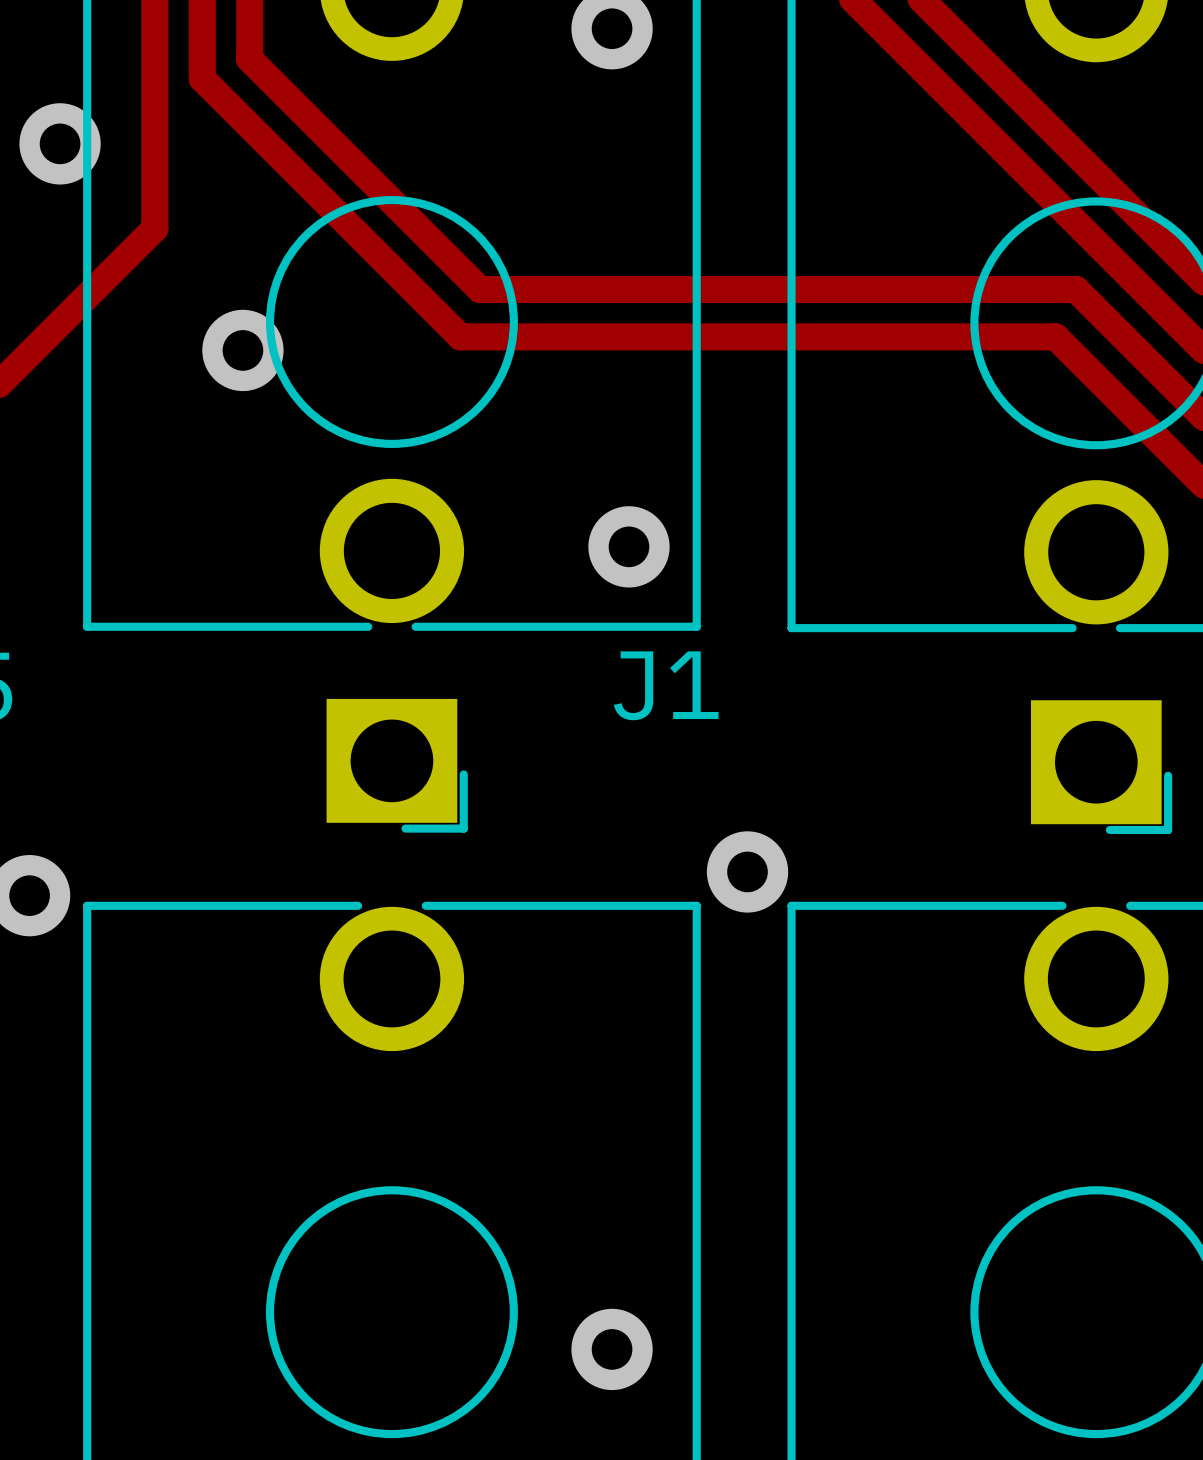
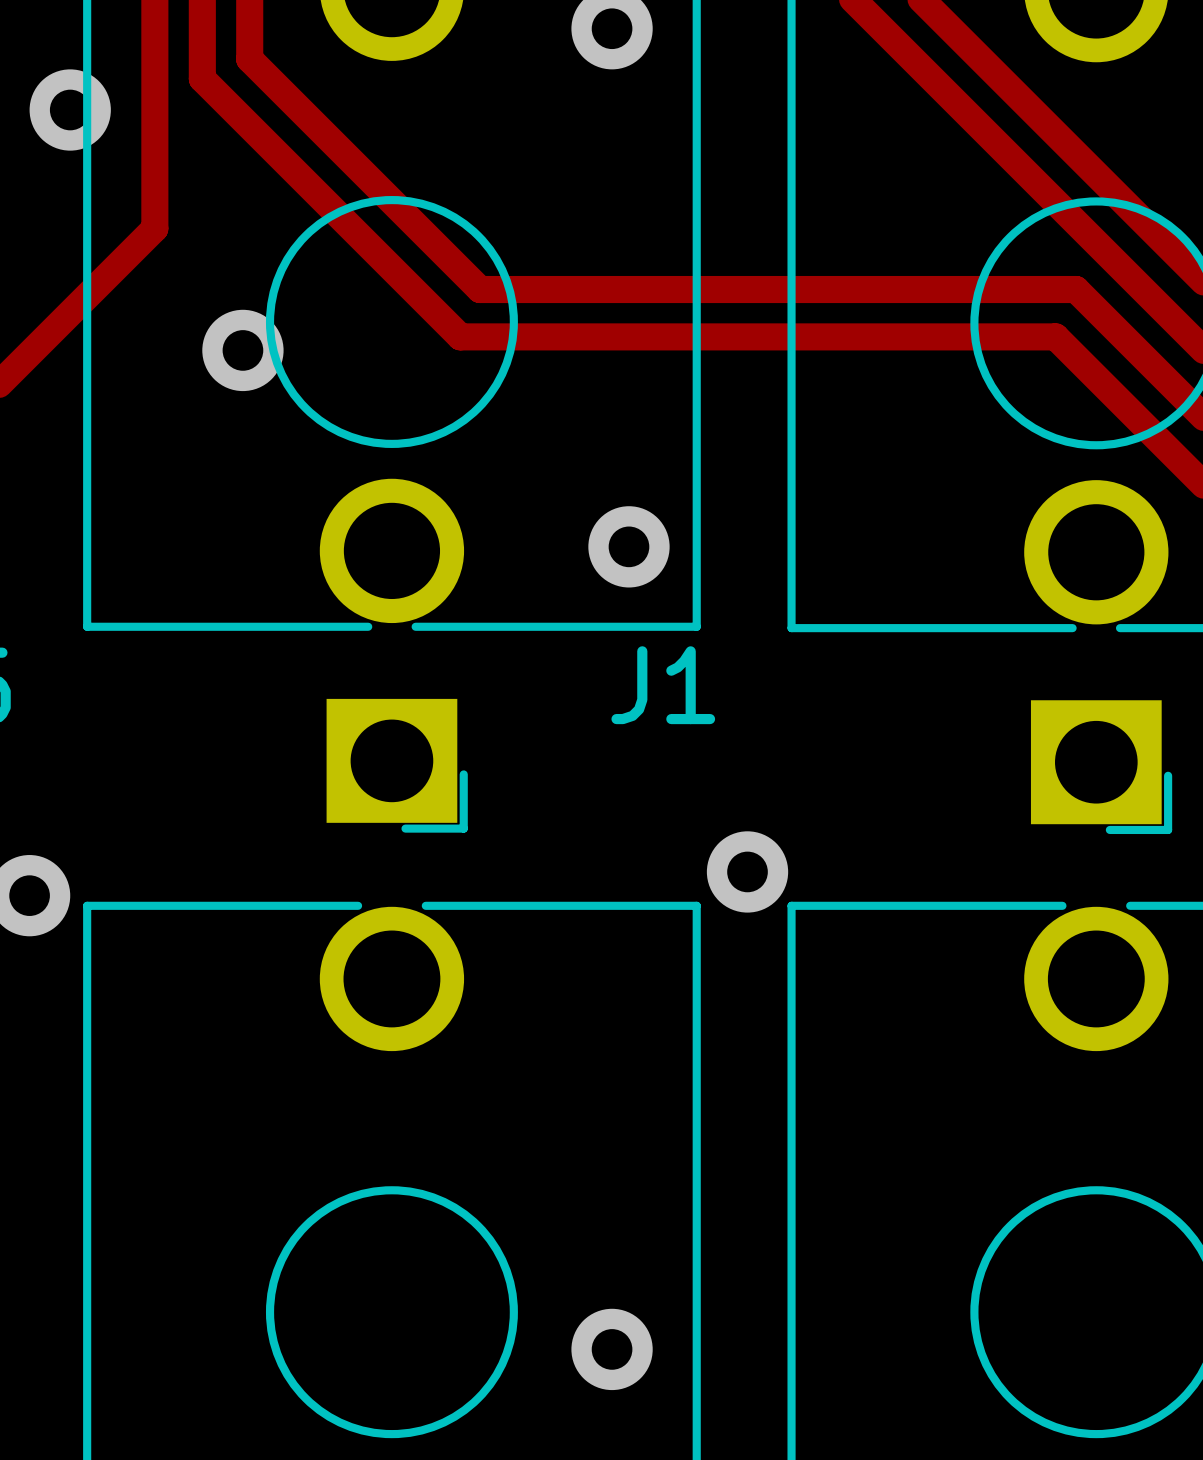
via position: (60, 143) -> (70, 110)

